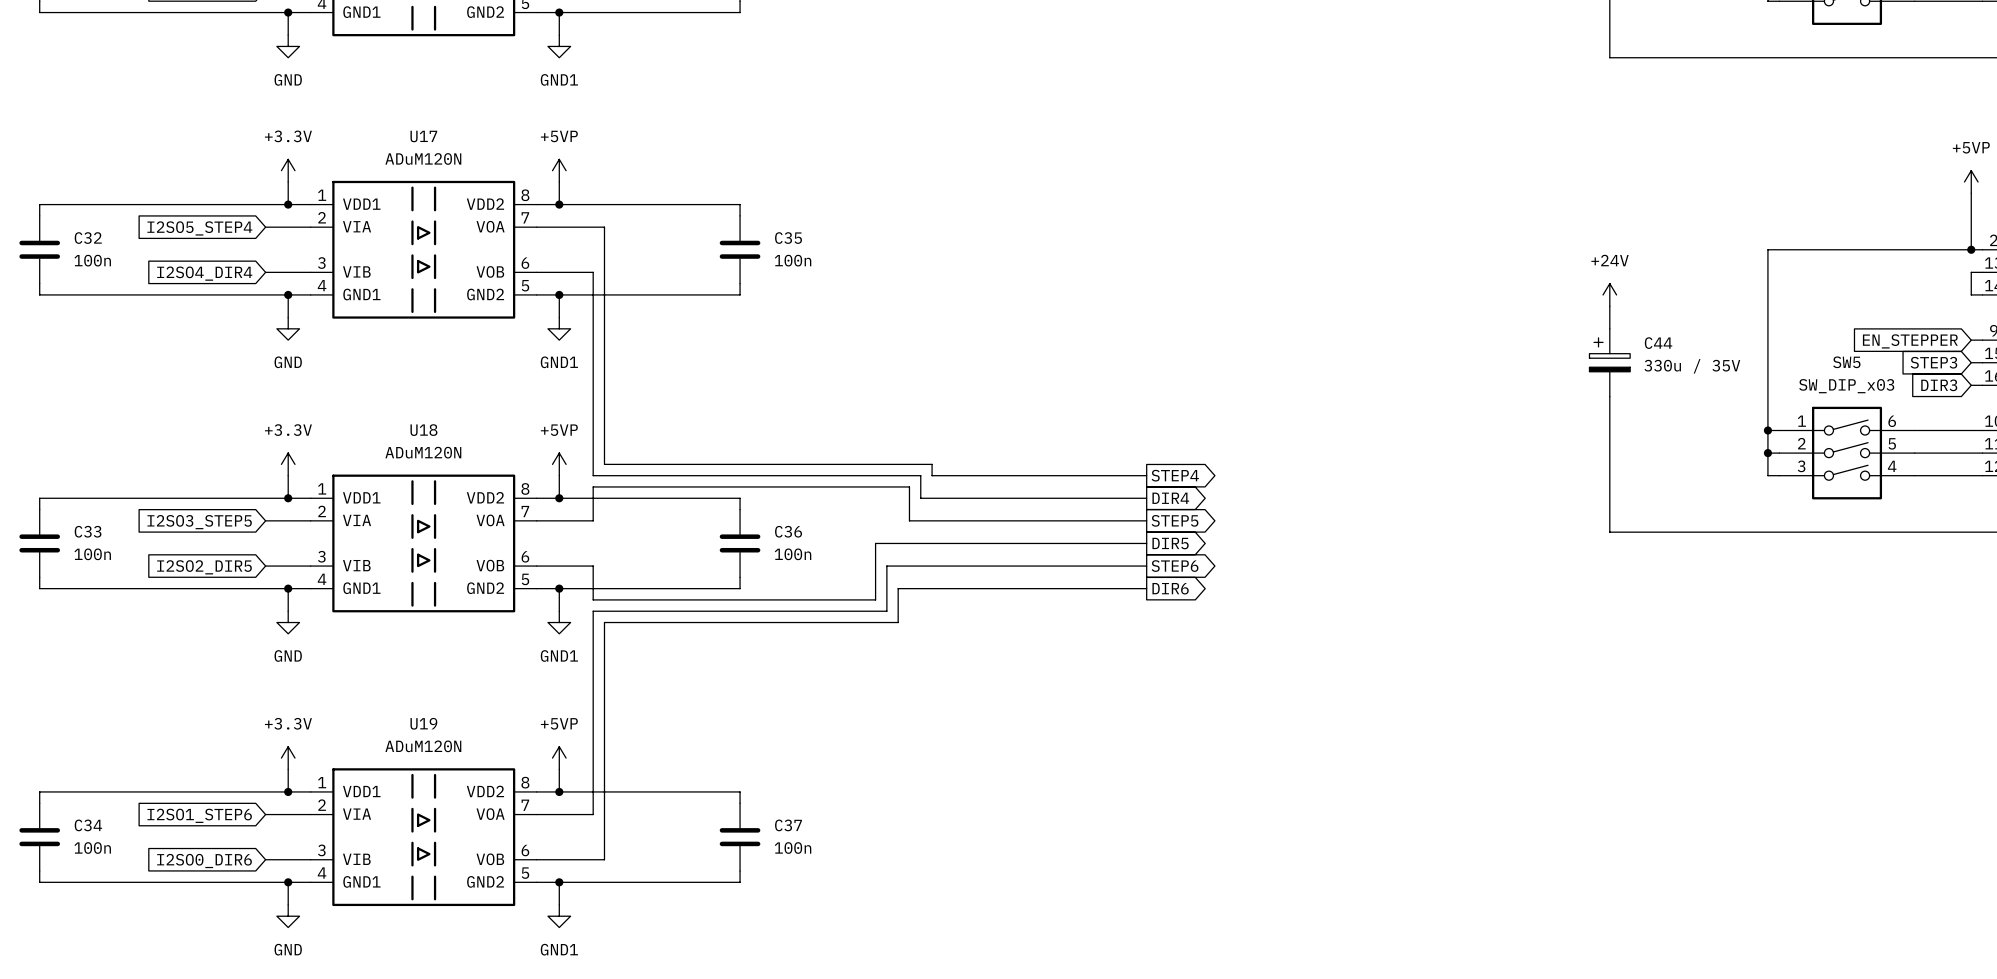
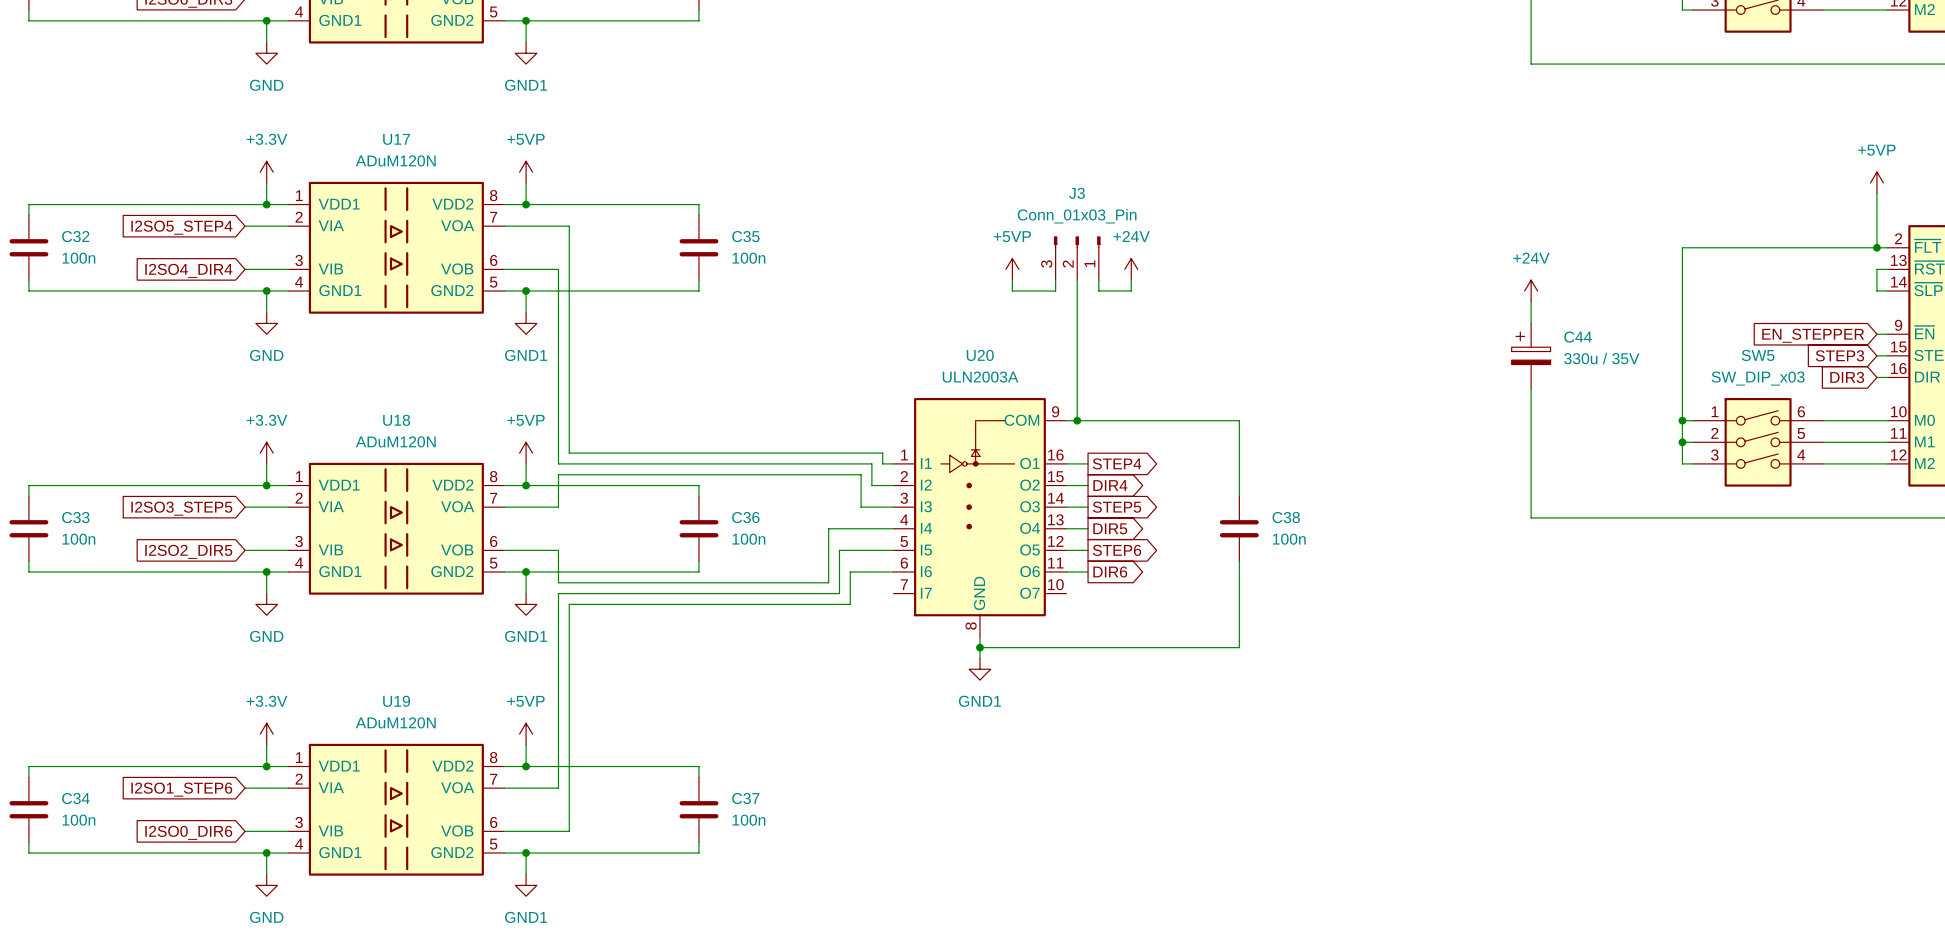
J3: none -> Conn_01x03_Pin (1077, 258)
power symbol: none -> +5VP (1012, 269)
power symbol: none -> +24V (1131, 269)
wire: none -> (1012, 280) (1012, 291) (1055, 291) (1055, 280)
wire: none -> (1077, 280) (1077, 420)
wire: none -> (1098, 280) (1098, 291) (1131, 291) (1131, 280)
wire: none -> (1066, 420) (1239, 420) (1239, 496)
junction: none -> (1077, 420)
U20: none -> ULN2003A (979, 517)
C38: none -> 100n (1239, 528)
wire: none -> (1239, 561) (1239, 647) (979, 647)
wire: none -> (979, 636) (979, 658)
junction: none -> (979, 647)
power symbol: none -> GND1 (979, 669)

